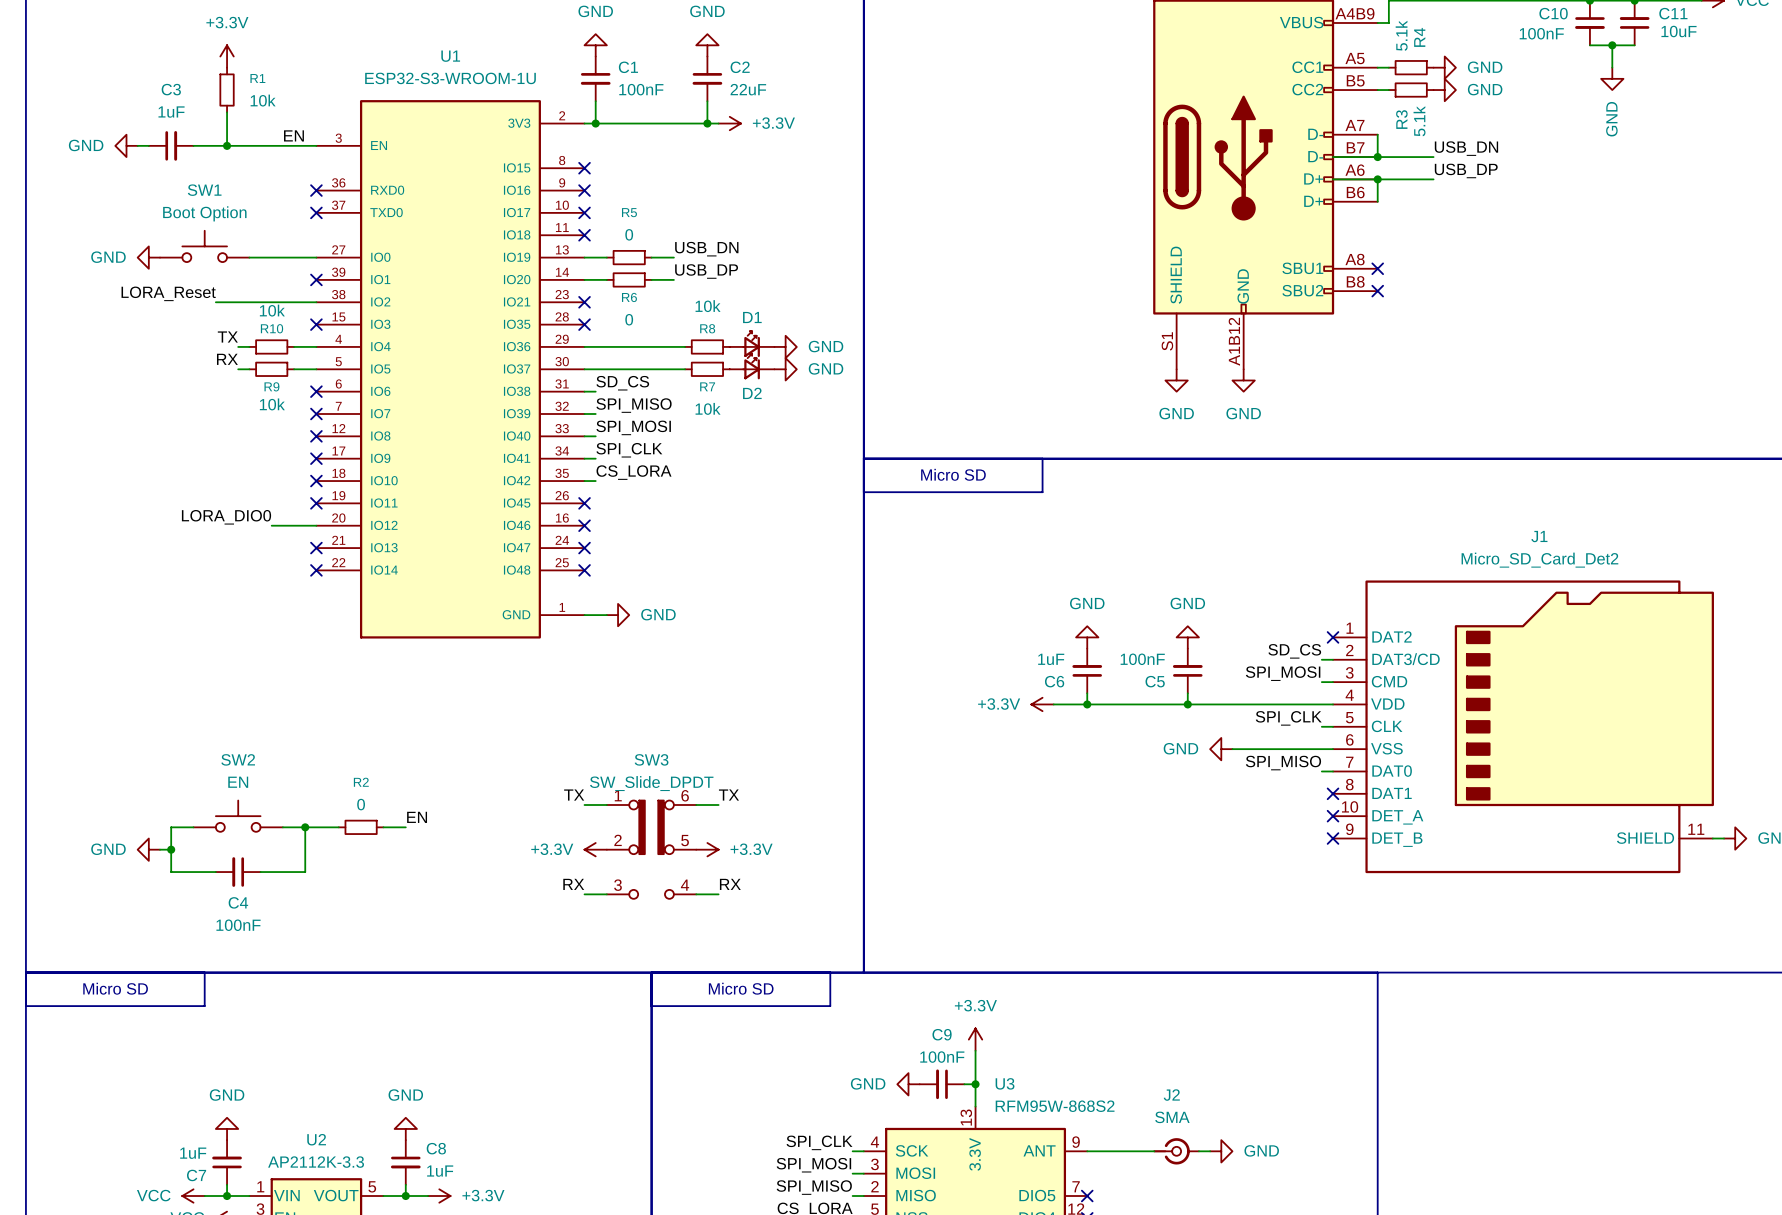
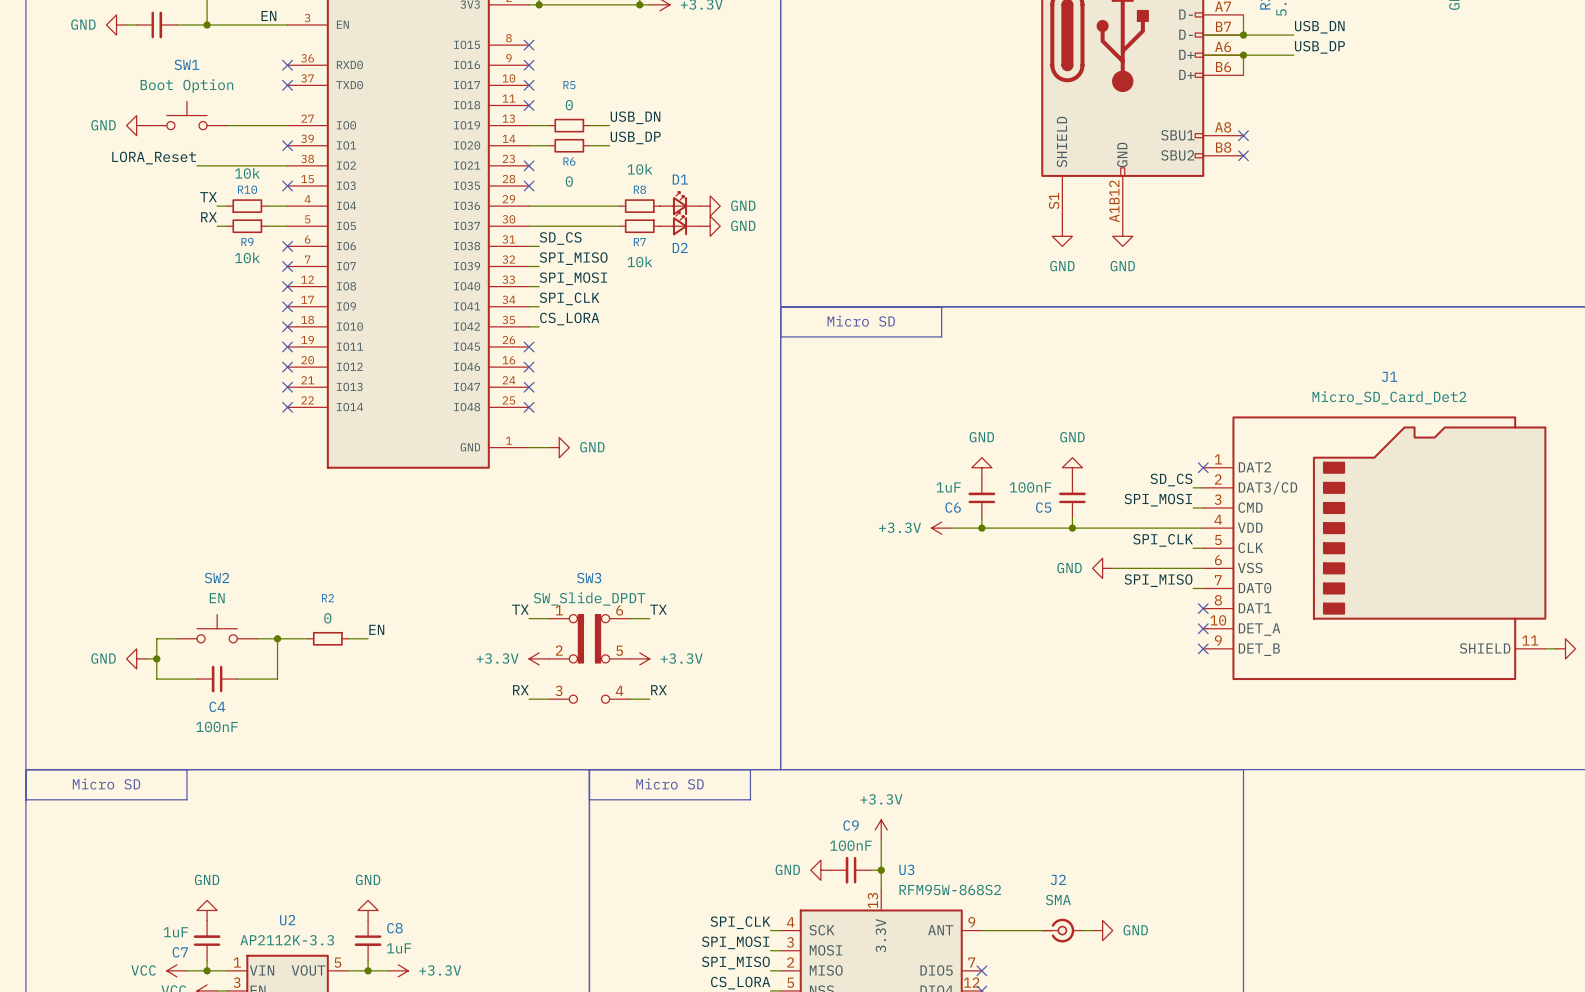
label: LORA_DIO0 (226, 517) -> none
wire: (271, 525) (316, 525) -> none
no-connect mark: none -> (287, 367)

